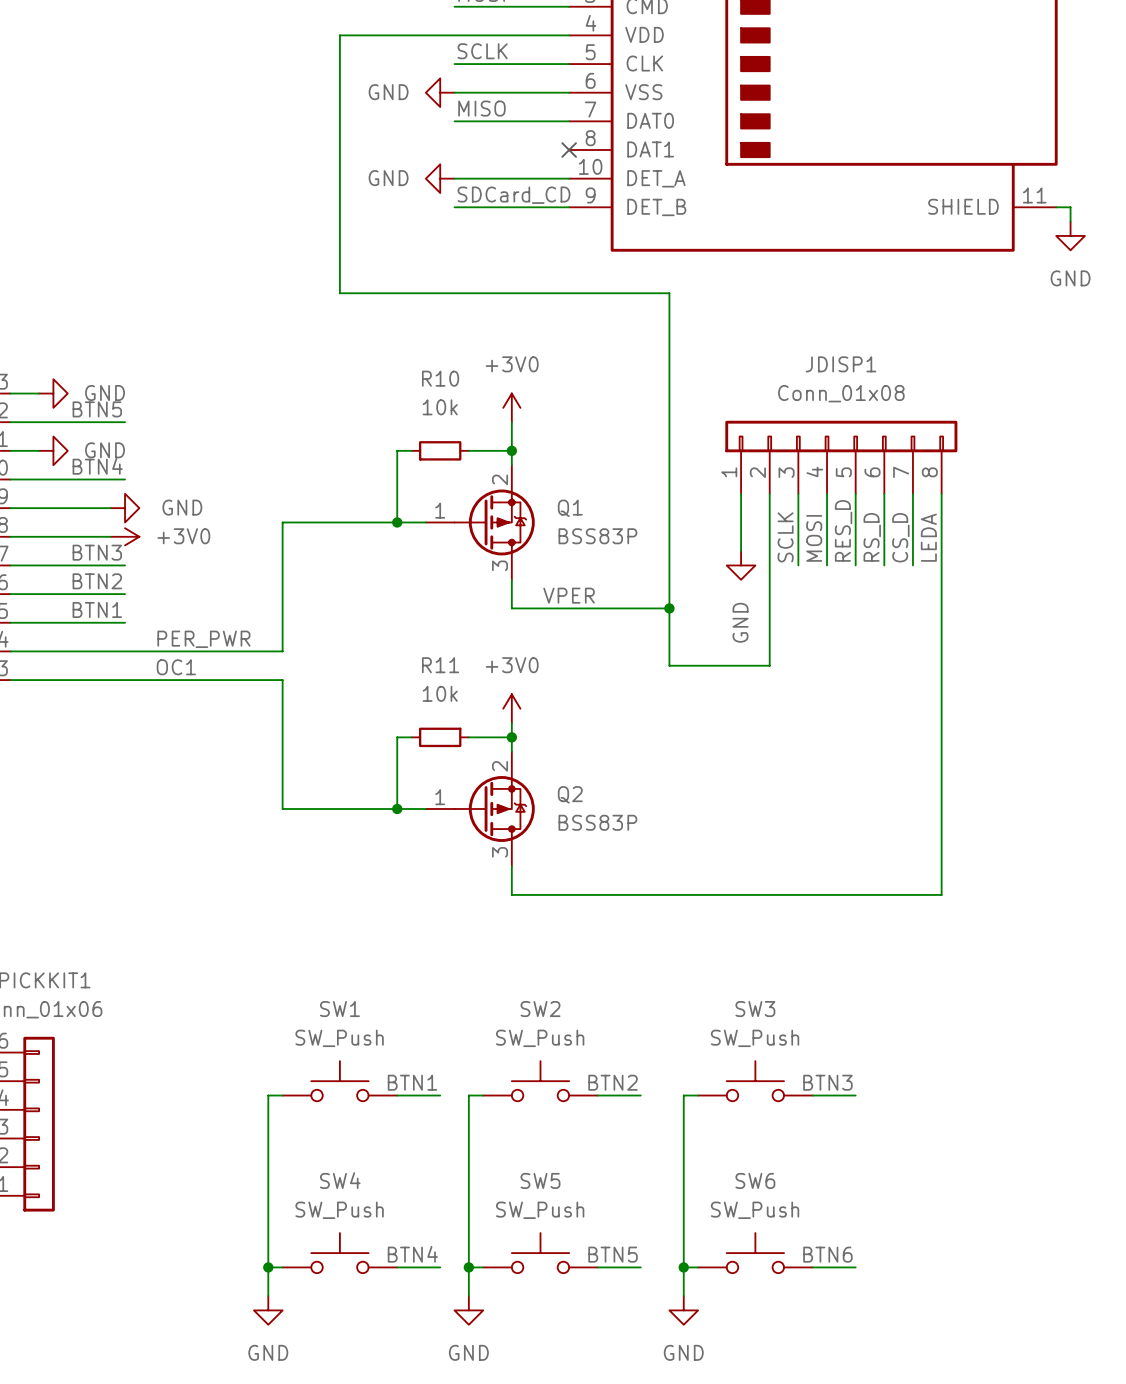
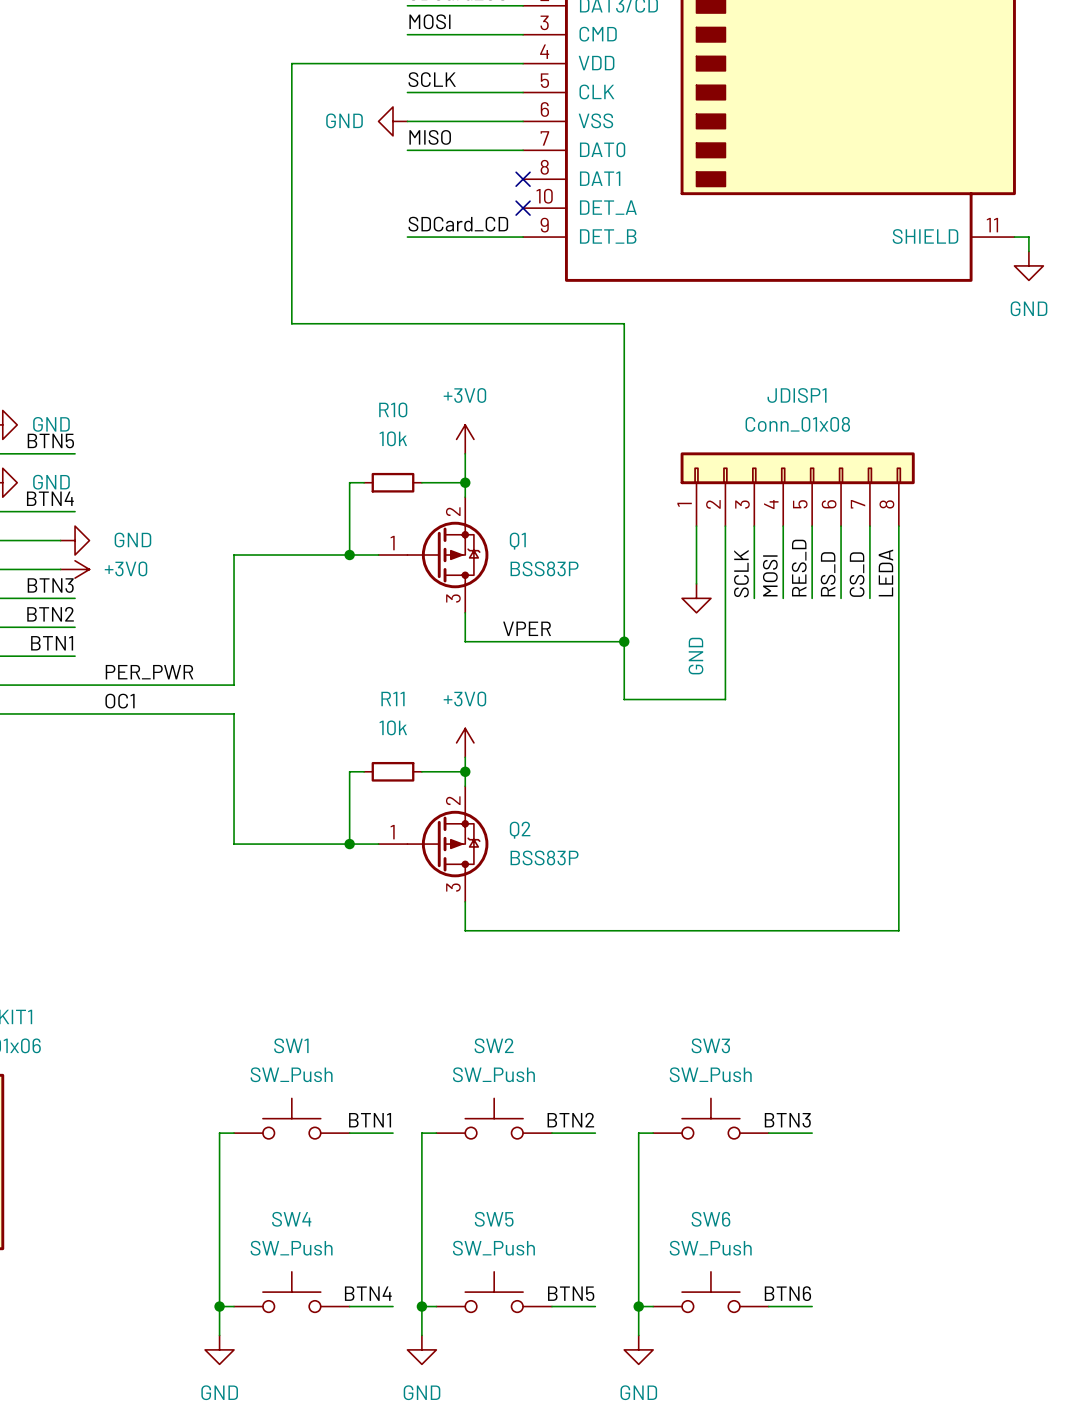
power symbol: GND (440, 178) -> none
wire: (454, 178) (569, 178) -> none
no-connect mark: none -> (523, 208)

